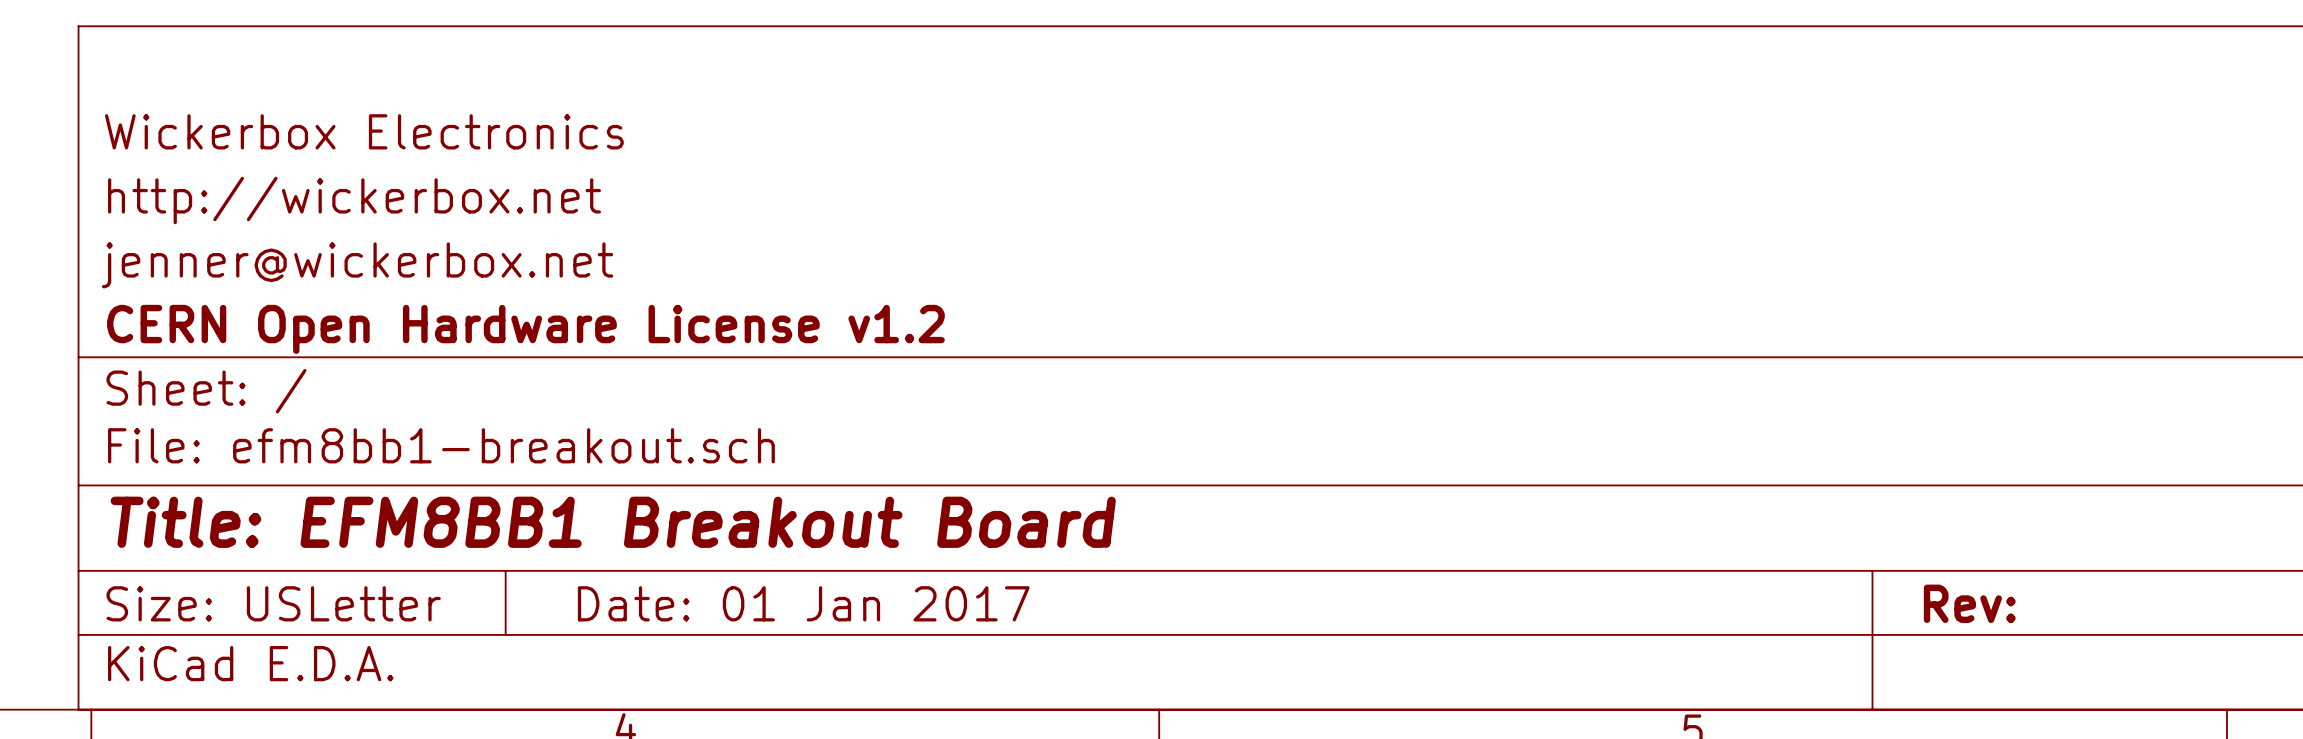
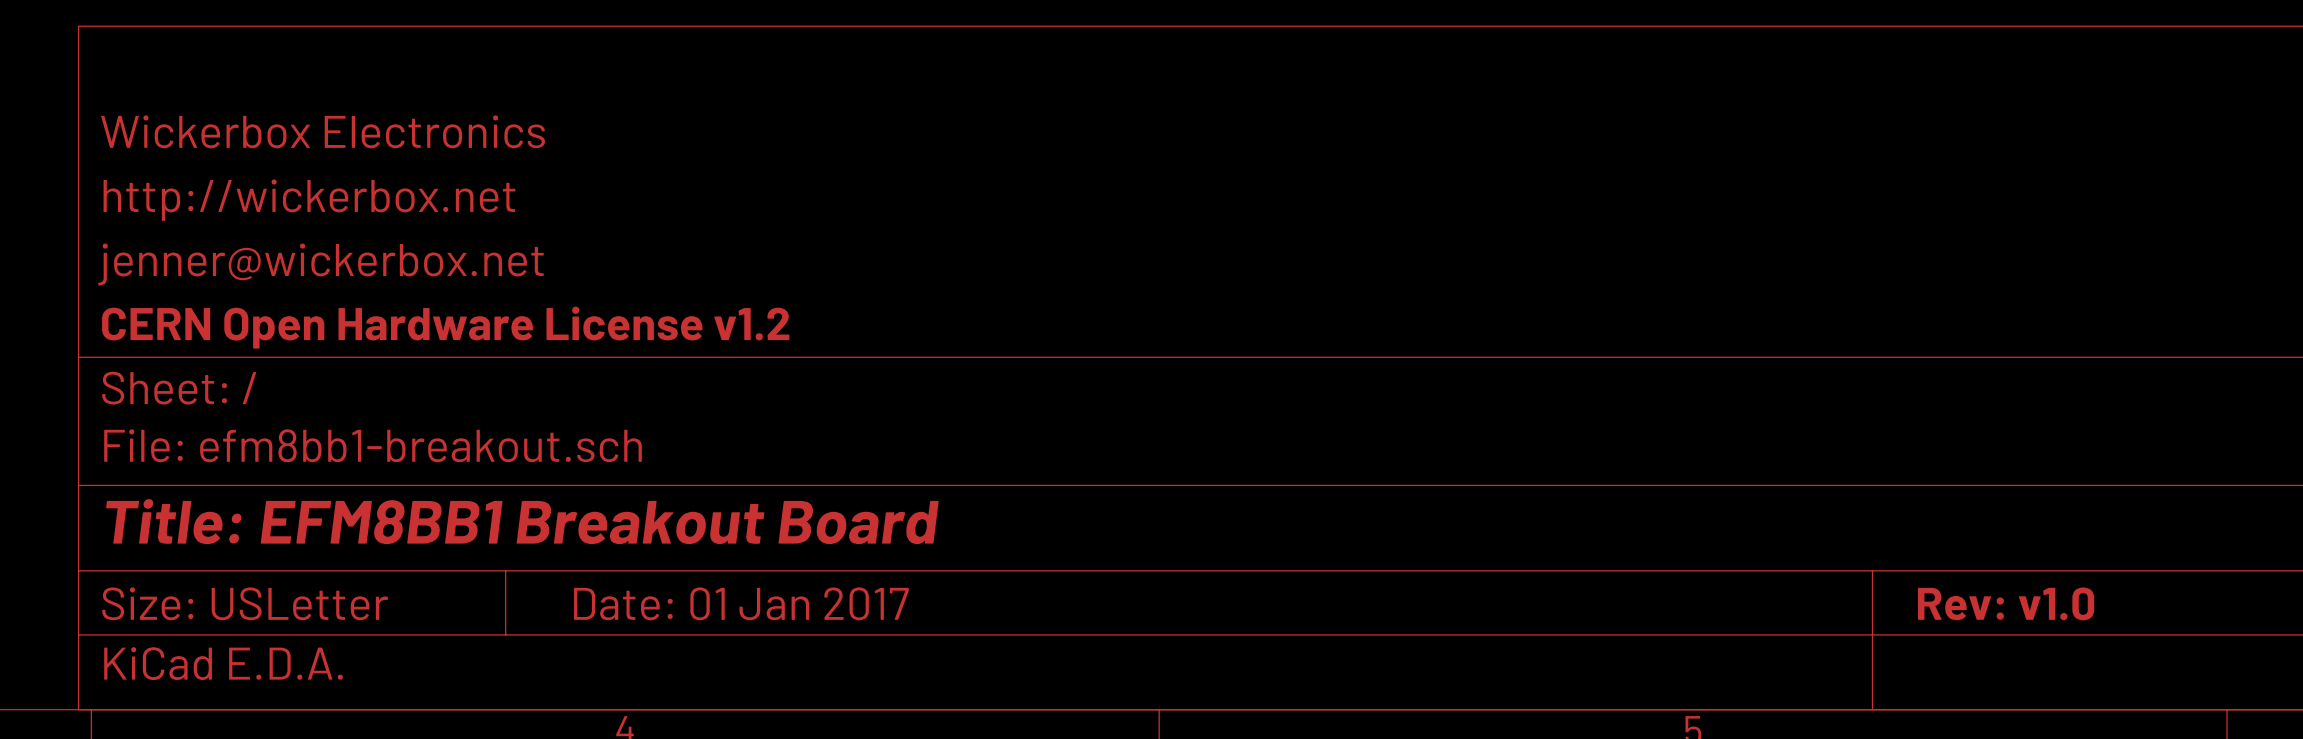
title block: Rev: (1969, 603) -> Rev: v1.0 (2006, 603)

